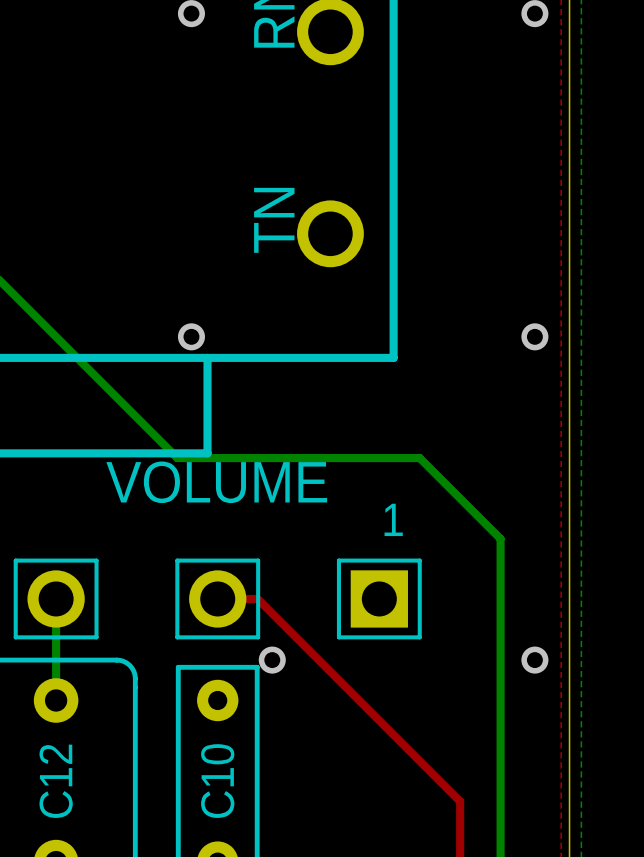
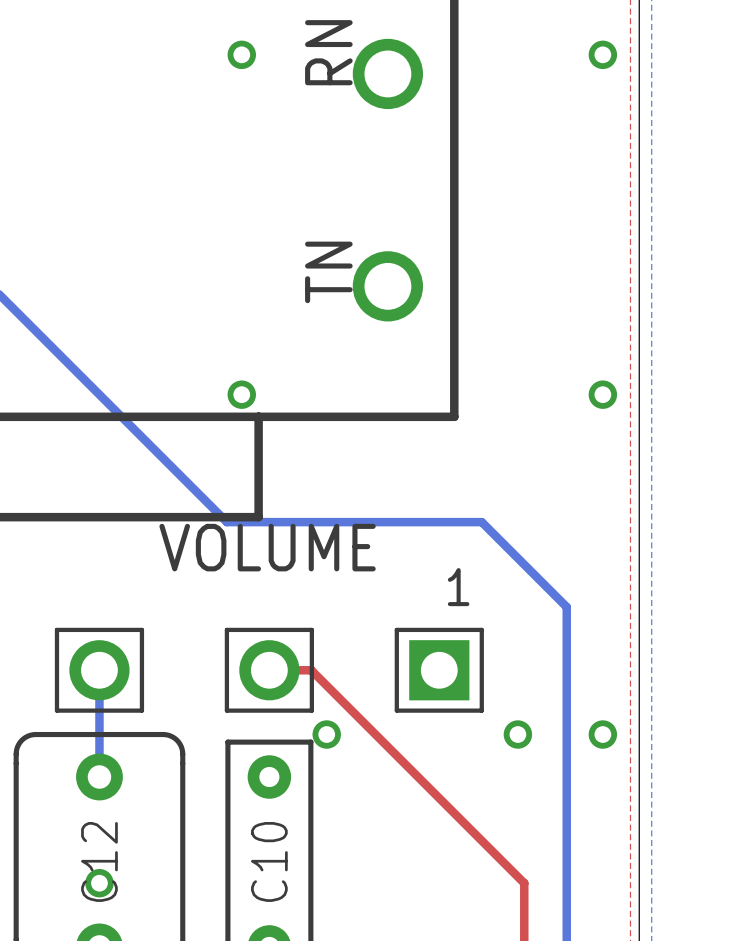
via: none -> (517, 734)
via: none -> (99, 883)

